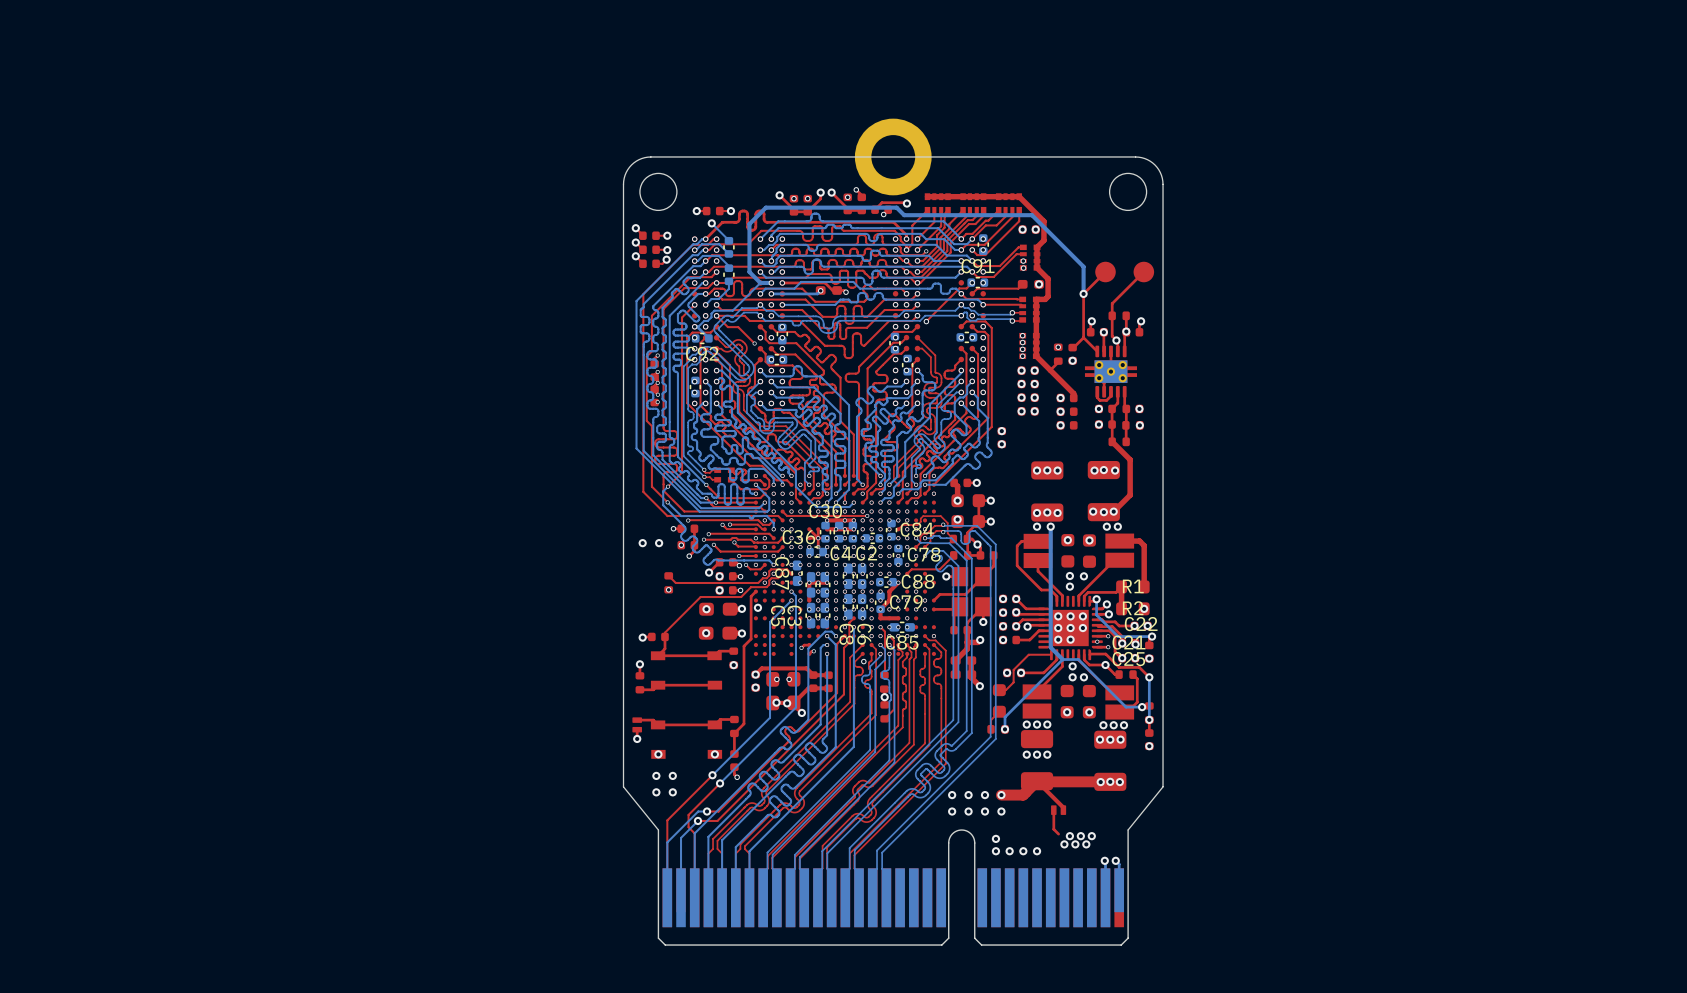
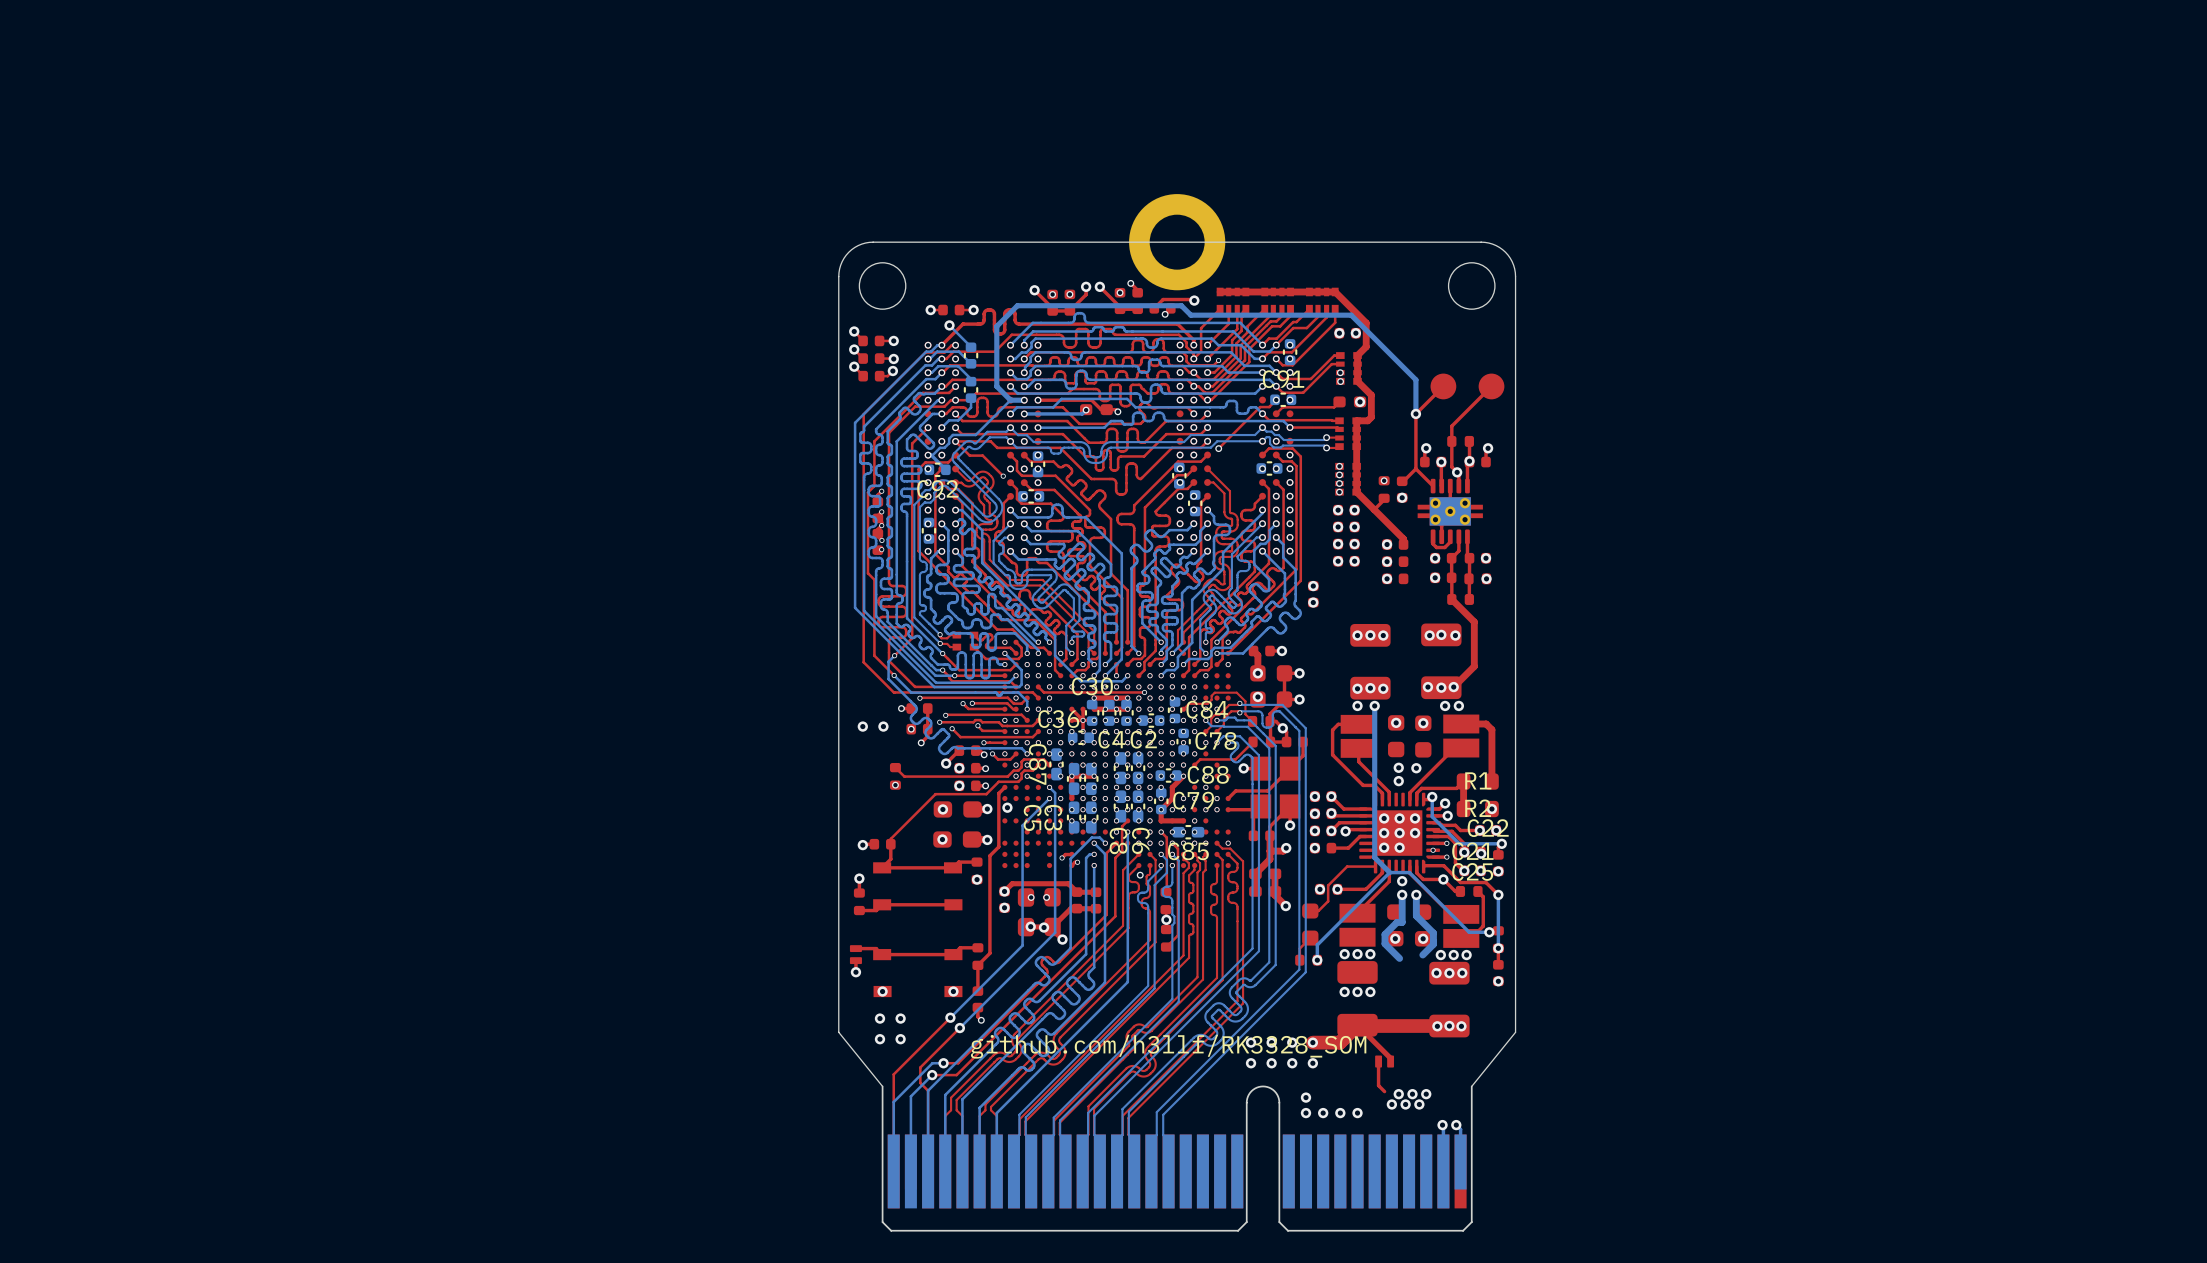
bottom track: none -> (1402, 894) (1402, 922) (1397, 922) (1384, 934) (1384, 943) (1399, 958)
bottom track: none -> (1416, 894) (1416, 915) (1433, 933) (1433, 944) (1422, 955)
text: none -> github.com/h3llf/RK3328_SOM (1168, 1046)

